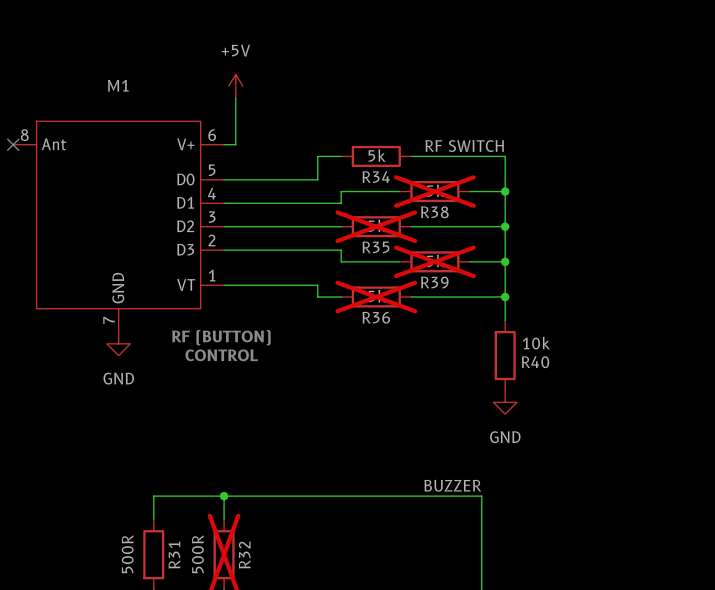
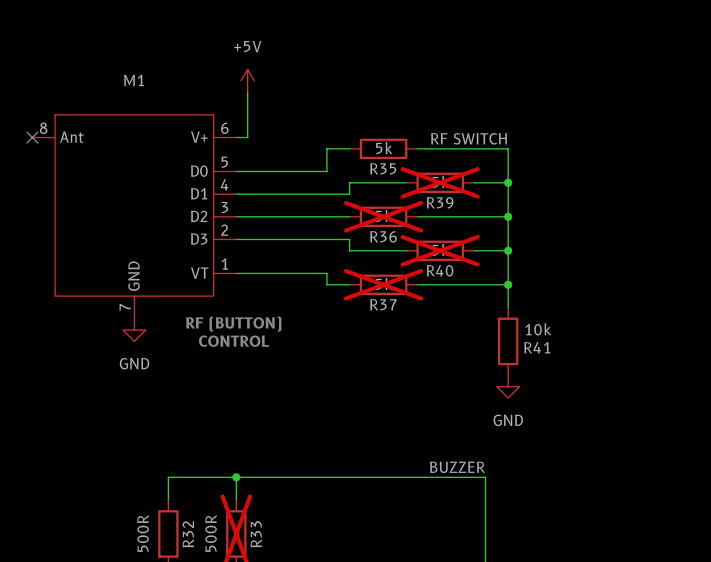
R34 name: R34 (376, 177) -> R35 (383, 168)
R38 name: R38 (434, 212) -> R39 (440, 202)
R35 name: R35 (375, 247) -> R36 (383, 236)
R39 name: R39 (434, 282) -> R40 (440, 270)
R36 name: R36 (376, 317) -> R37 (383, 304)
R40 name: R40 (535, 362) -> R41 (537, 347)
R31 name: R31 (174, 555) -> R32 (188, 534)
R32 name: R32 (244, 555) -> R33 (256, 534)

